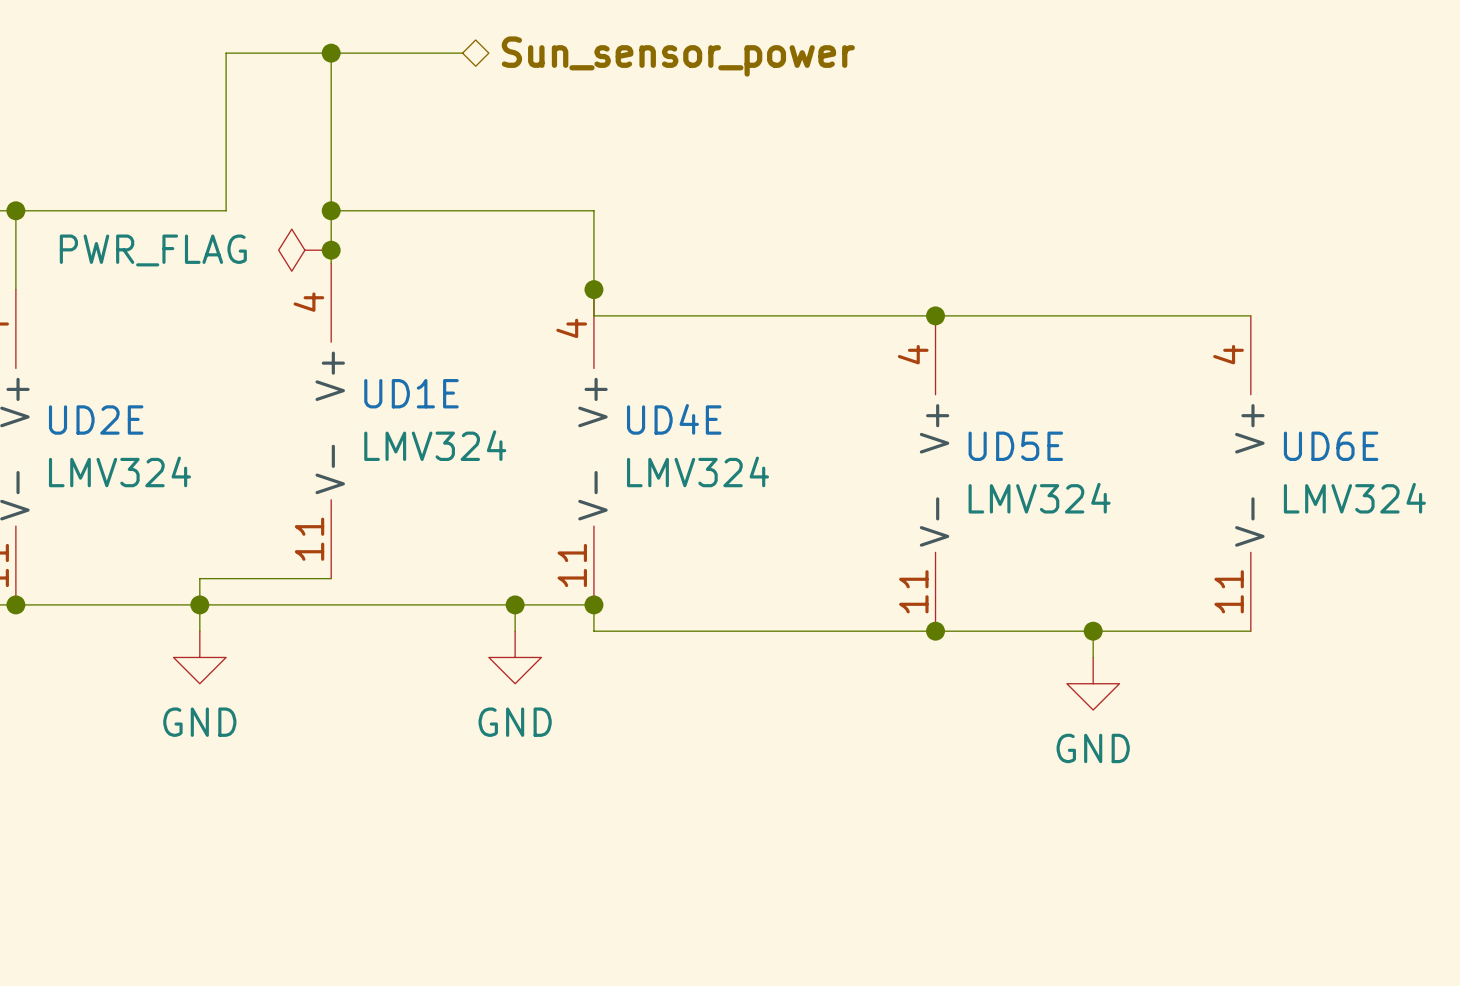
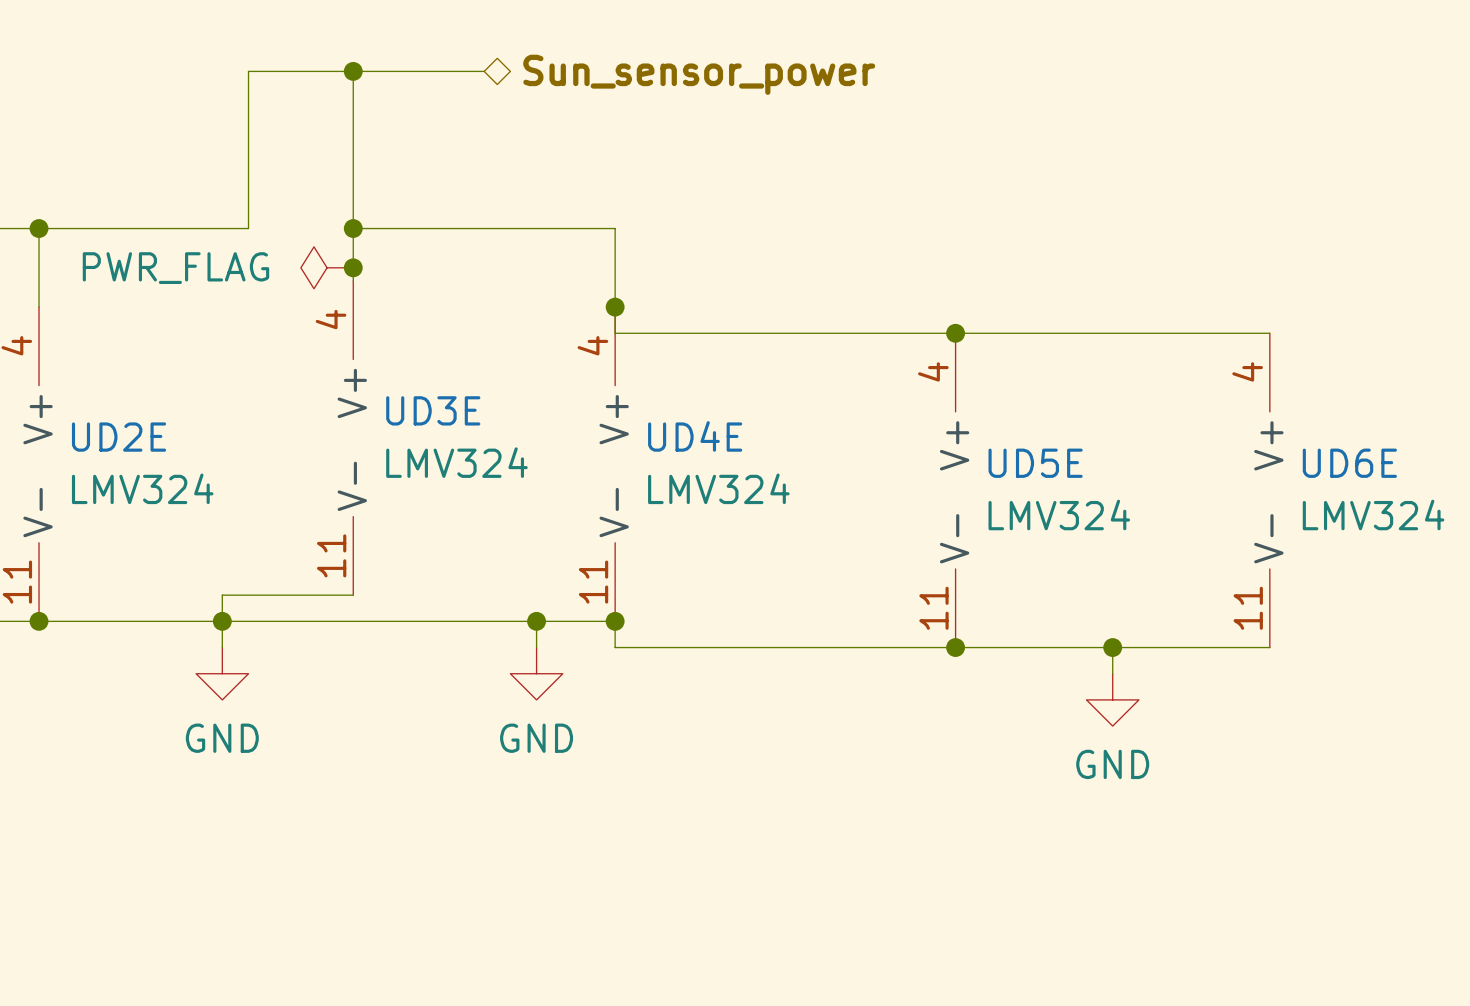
UD1E name: UD1E (411, 393) -> UD3E (433, 410)

